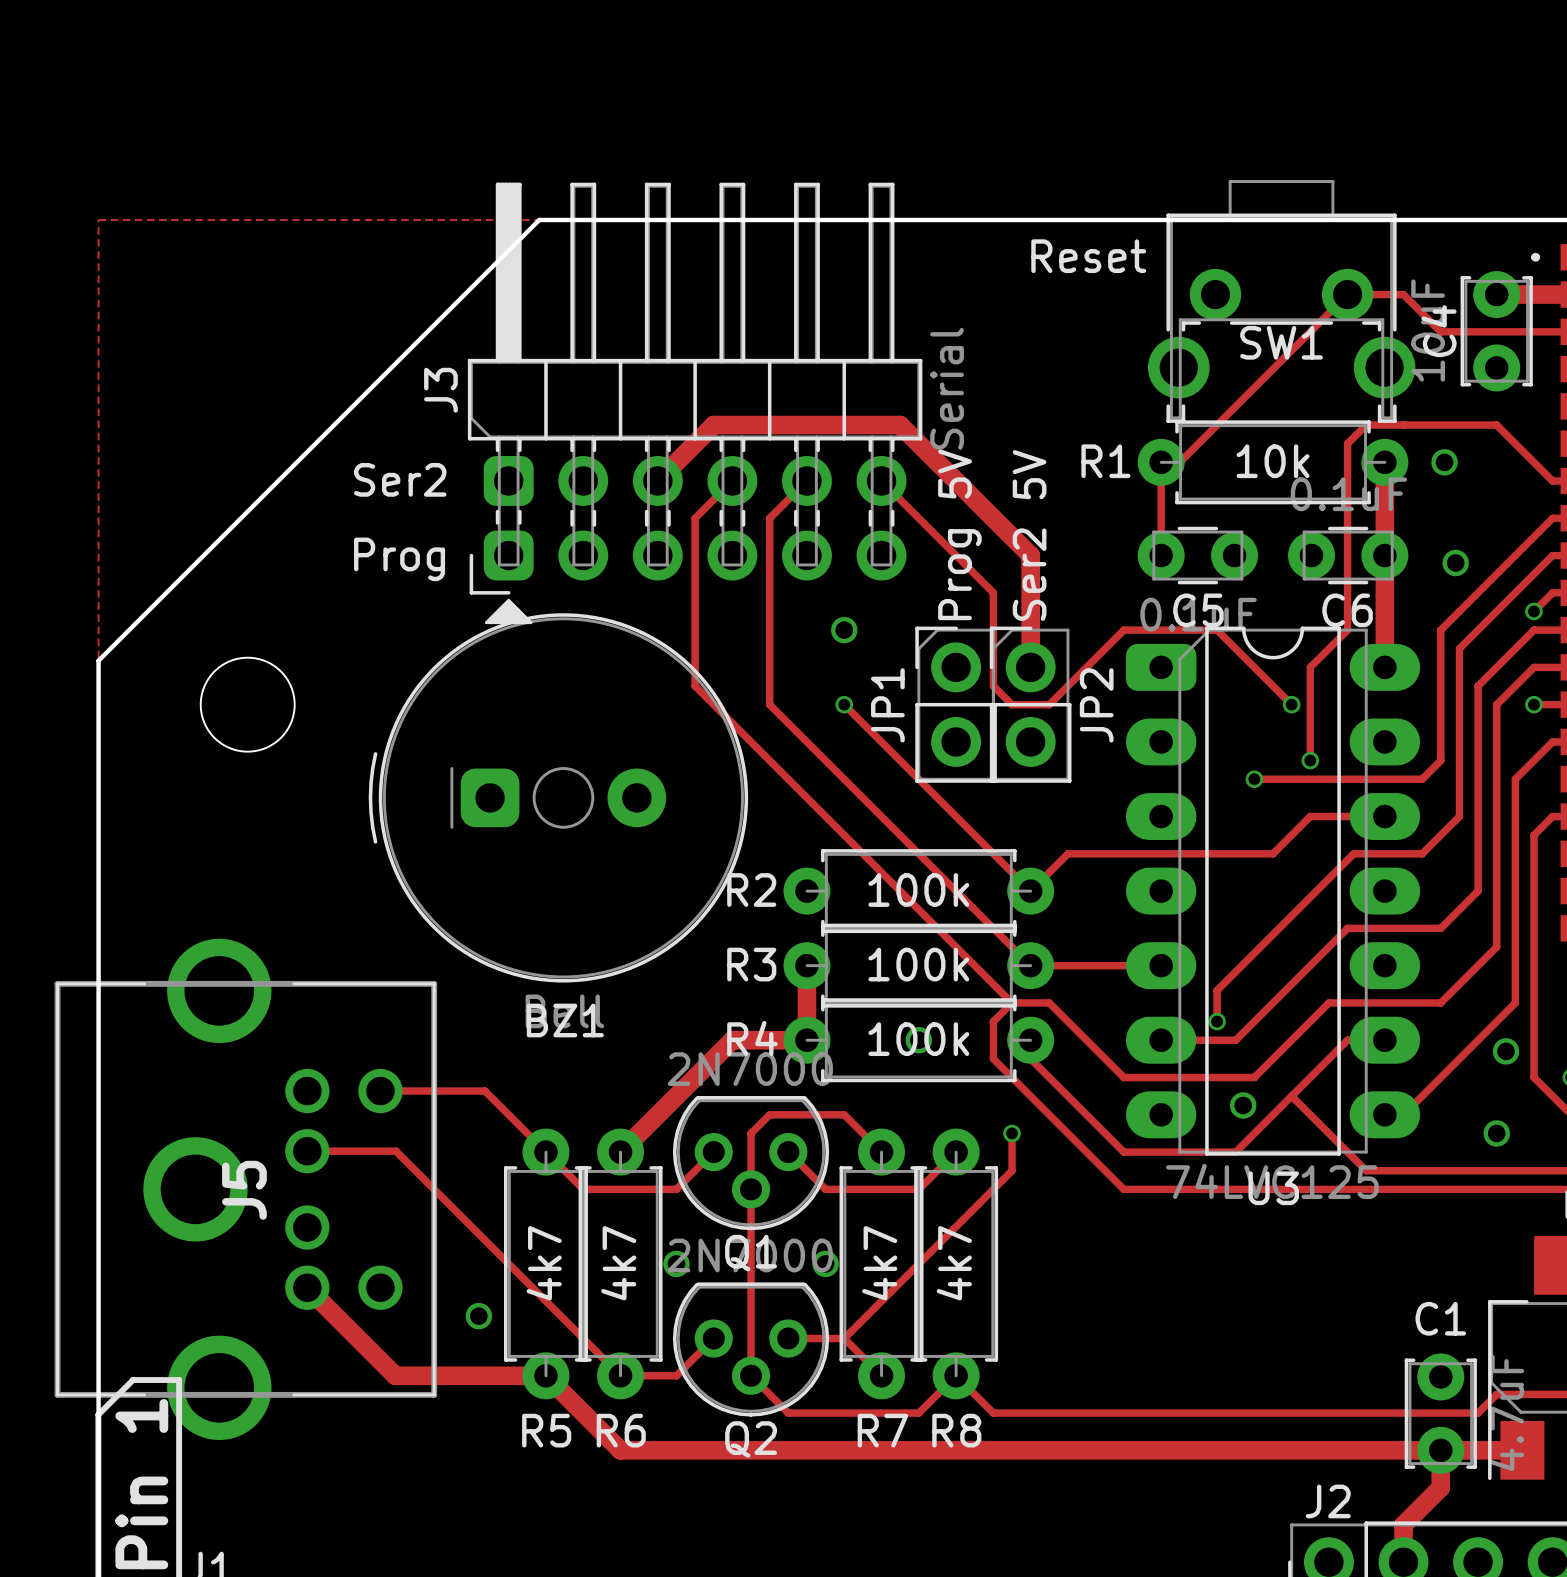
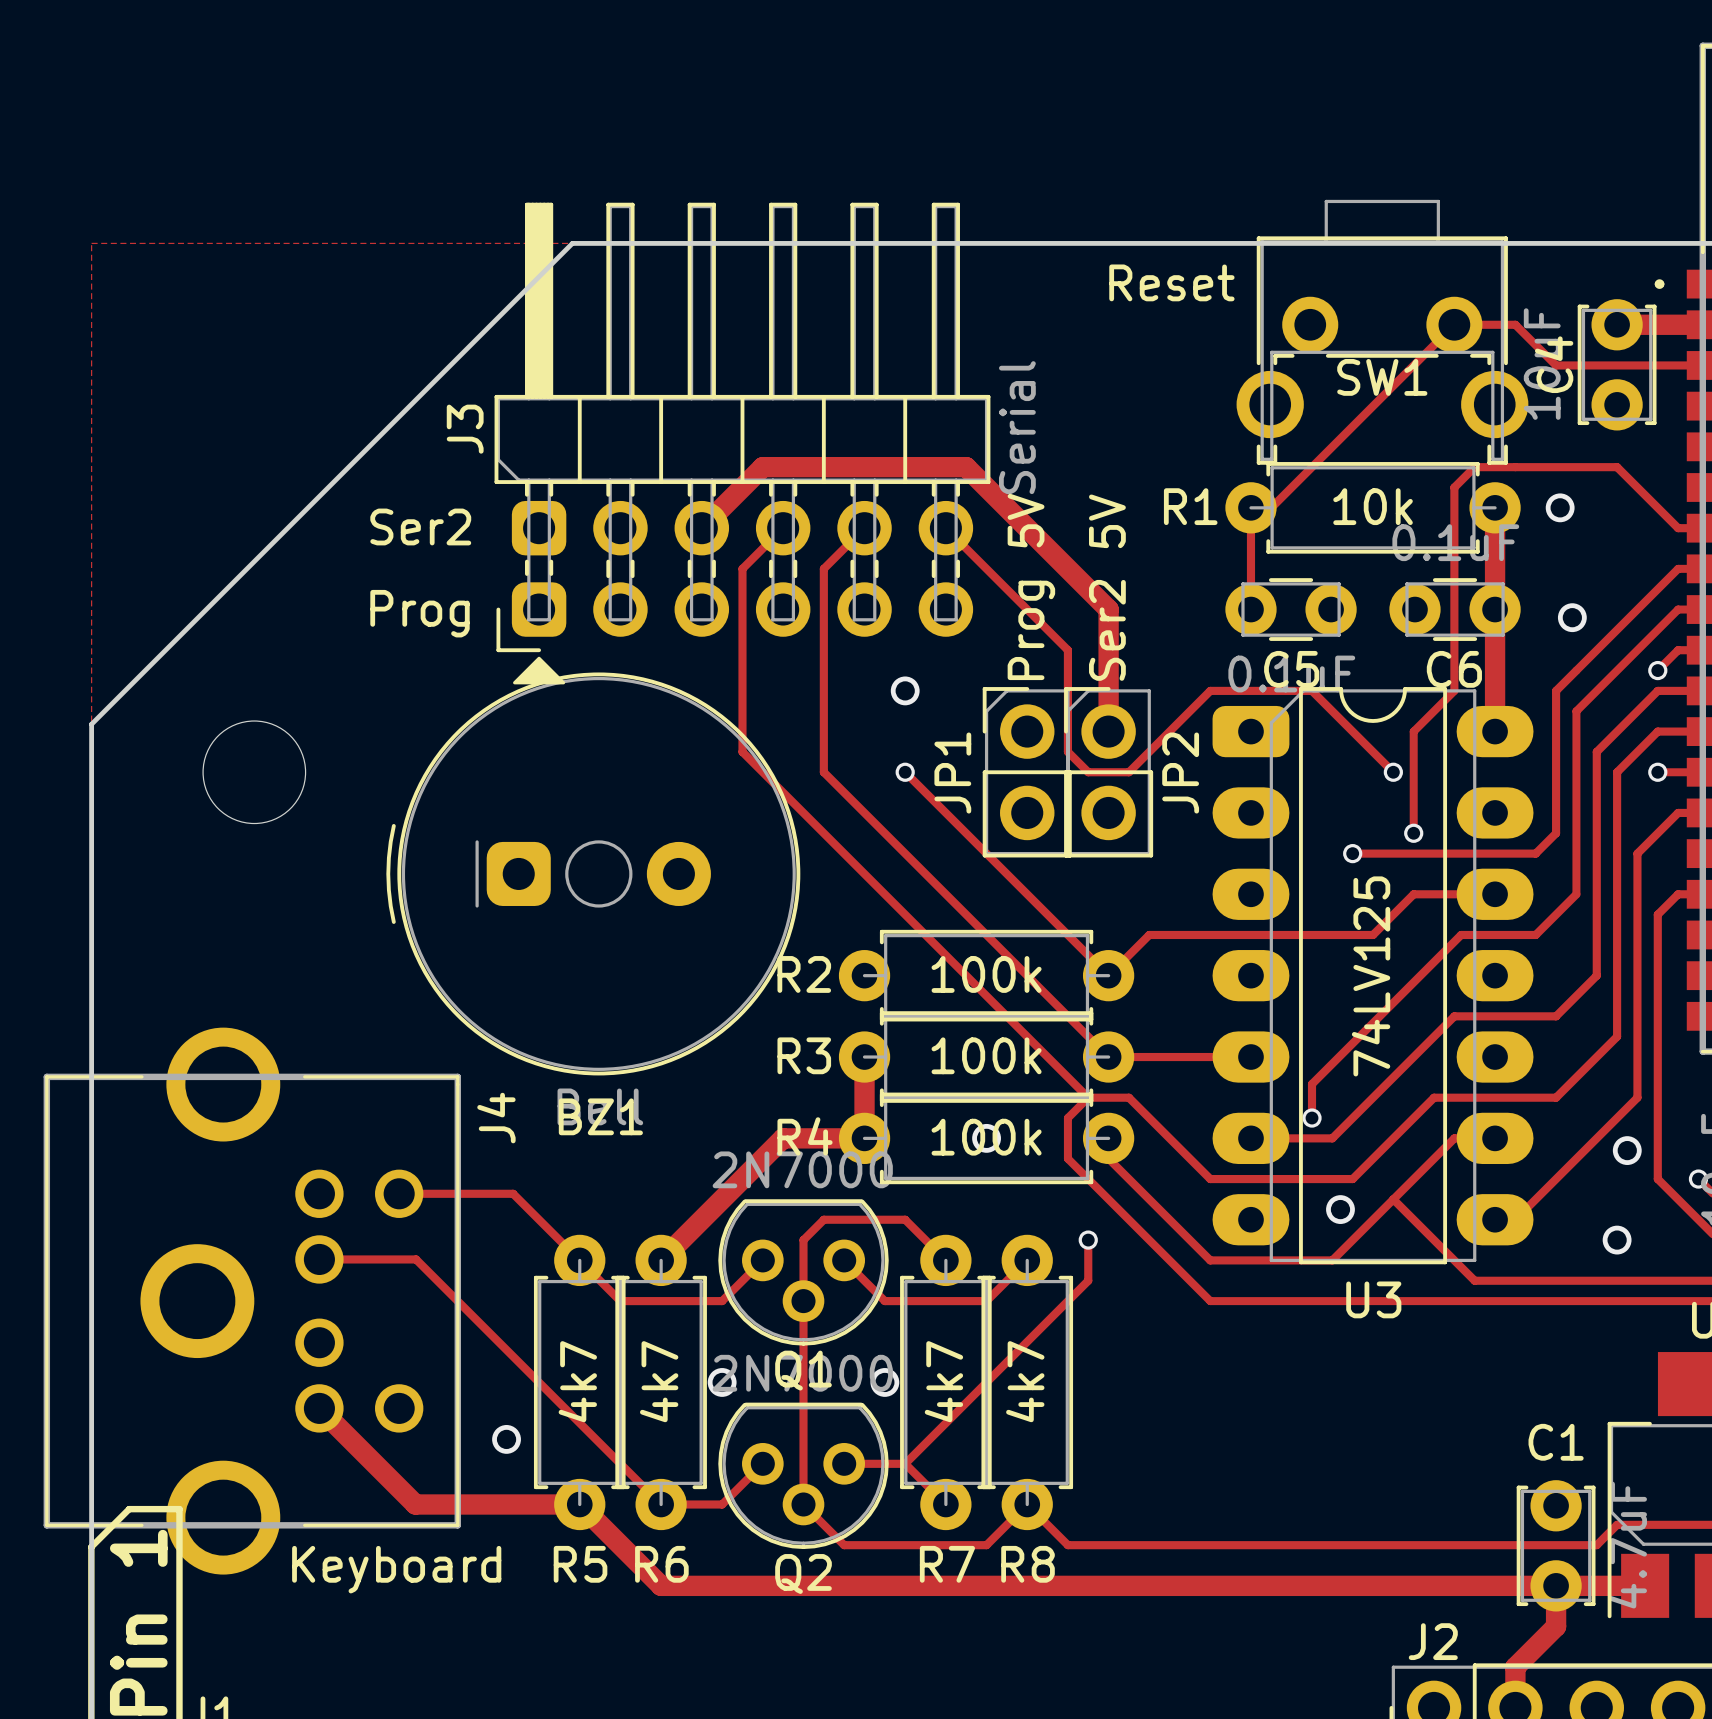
U3 value: 74LVC125 (1272, 1181) -> 74LV125 (1371, 976)
J5 name: J5 (244, 1190) -> J4 (496, 1118)
J5 value: none -> Keyboard (396, 1569)

